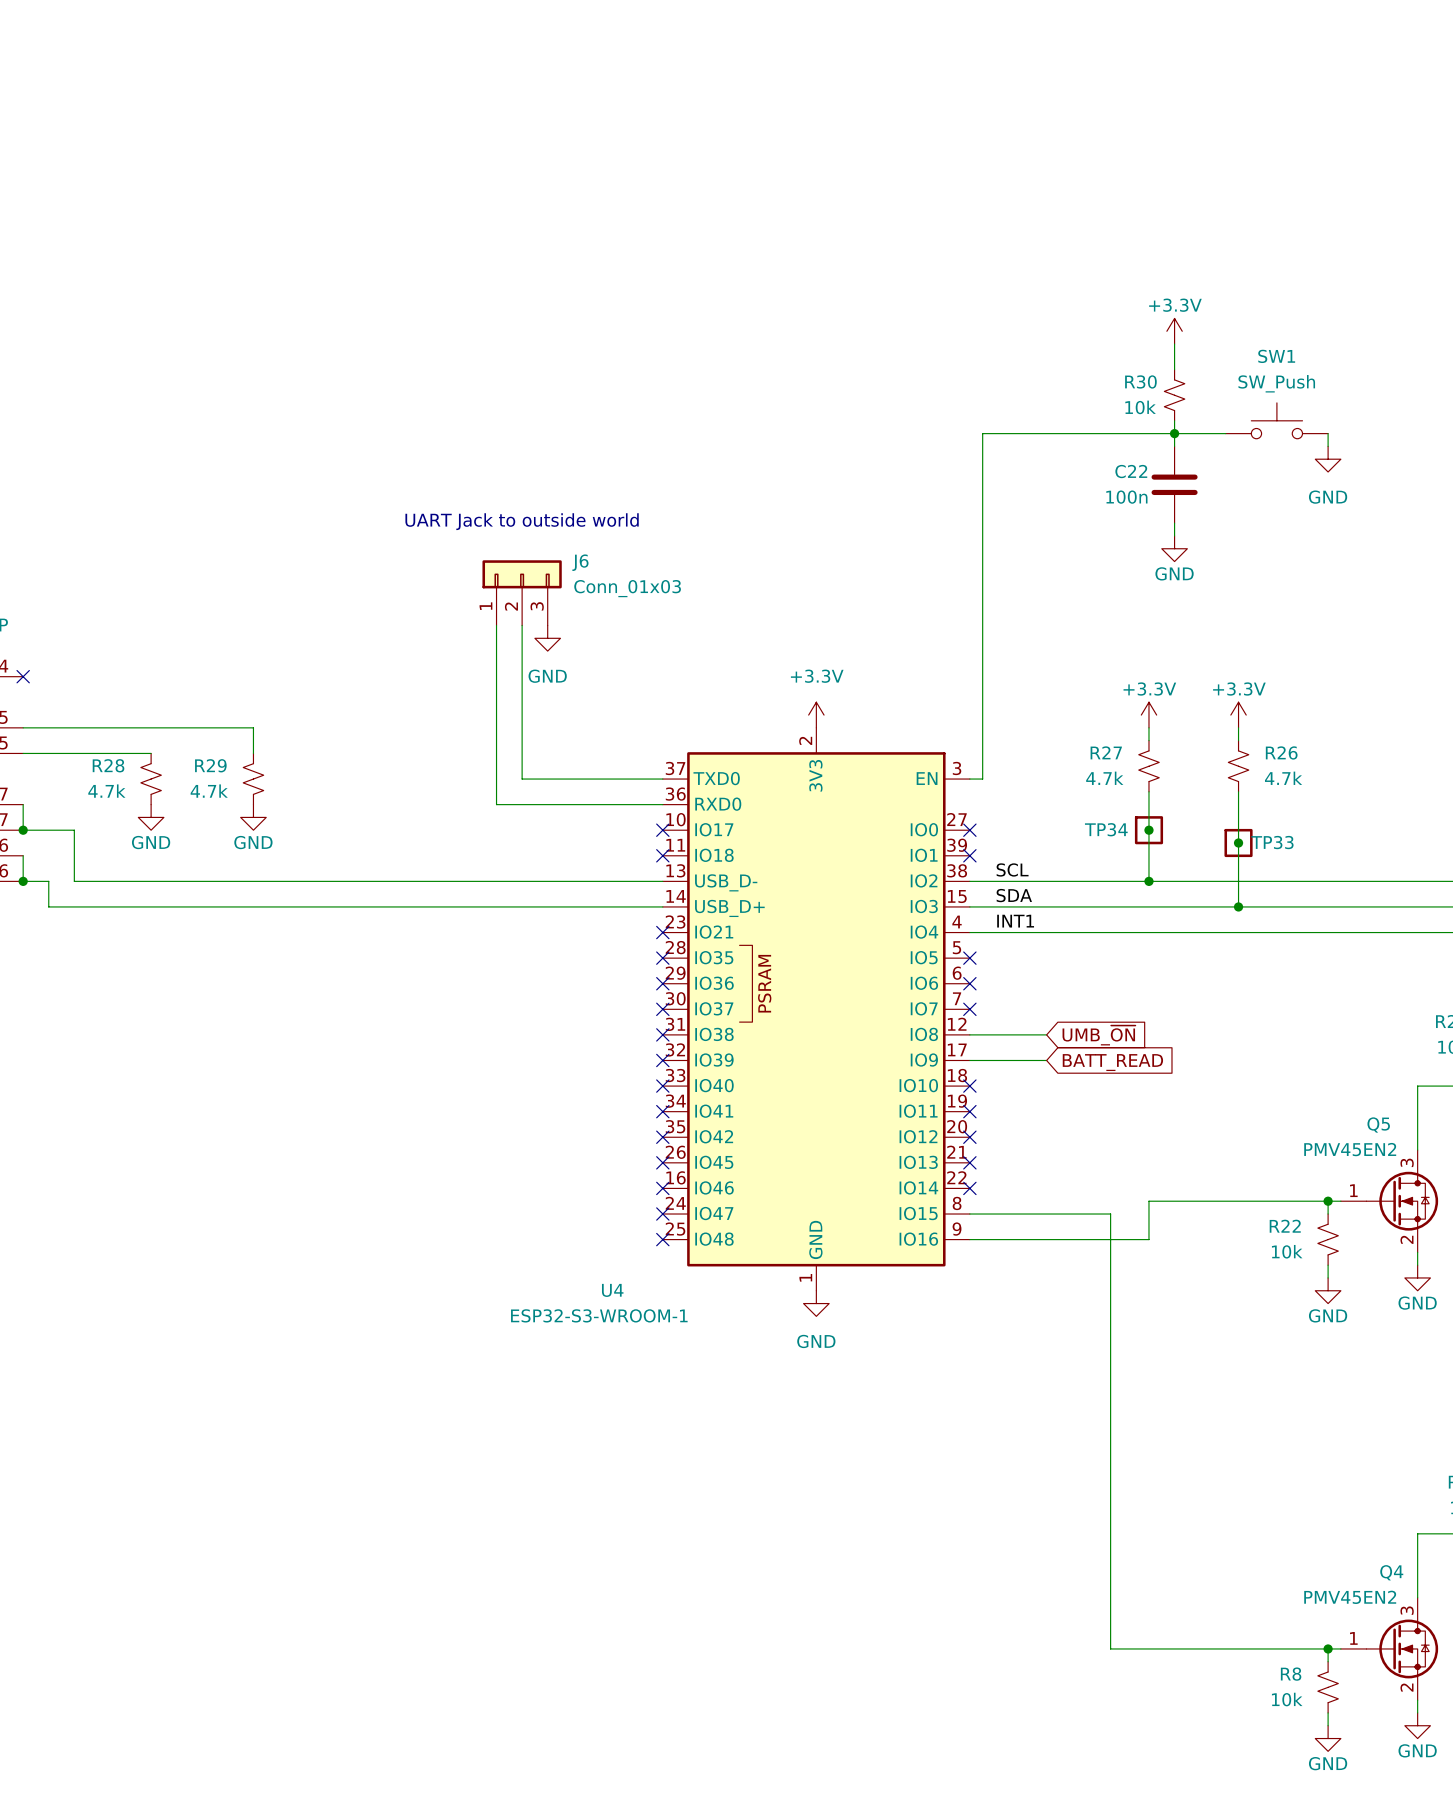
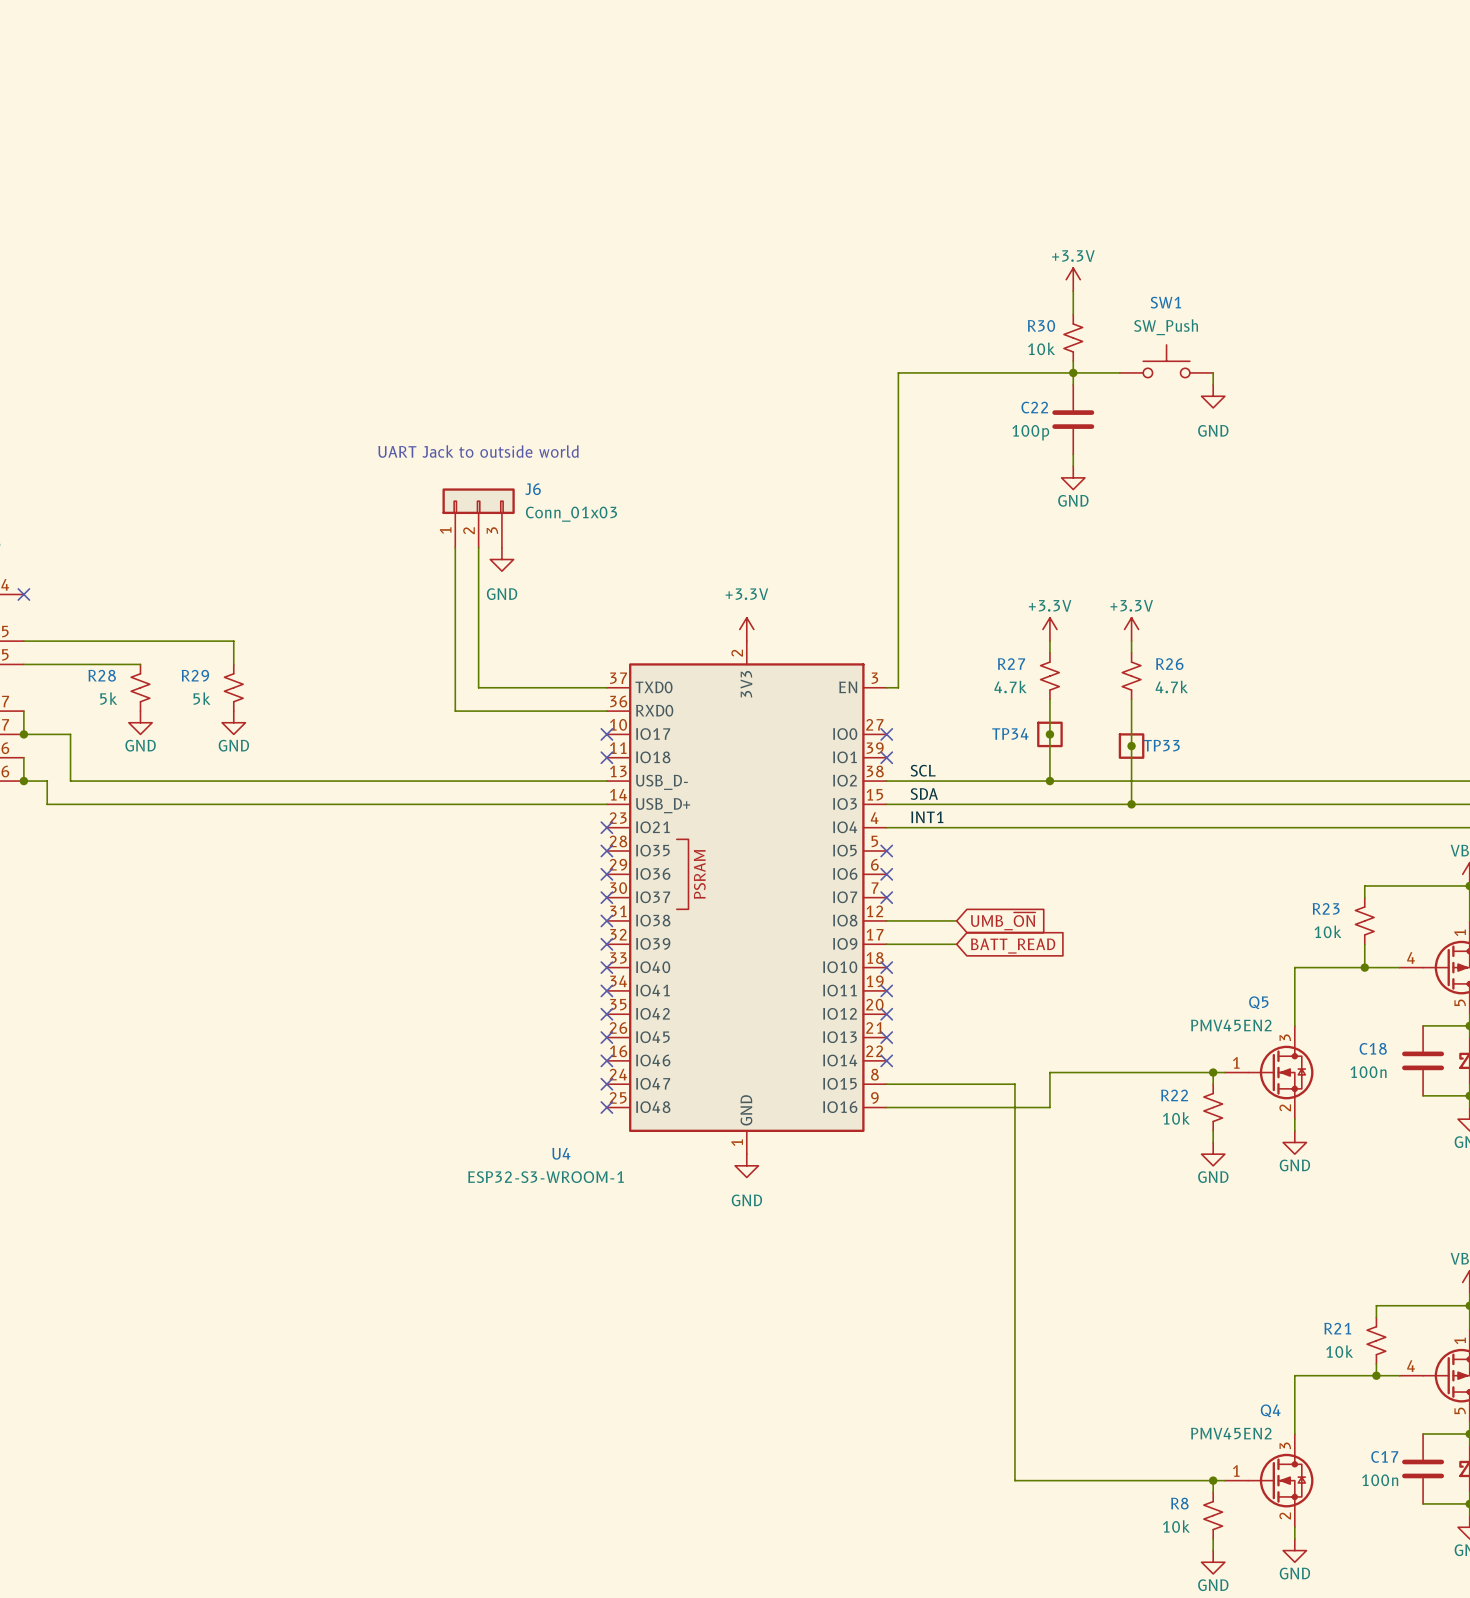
C22 value: 100n (1126, 497) -> 100p (1030, 432)
R28 value: 4.7k (106, 791) -> 5k (108, 698)
R29 value: 4.7k (209, 791) -> 5k (202, 698)

